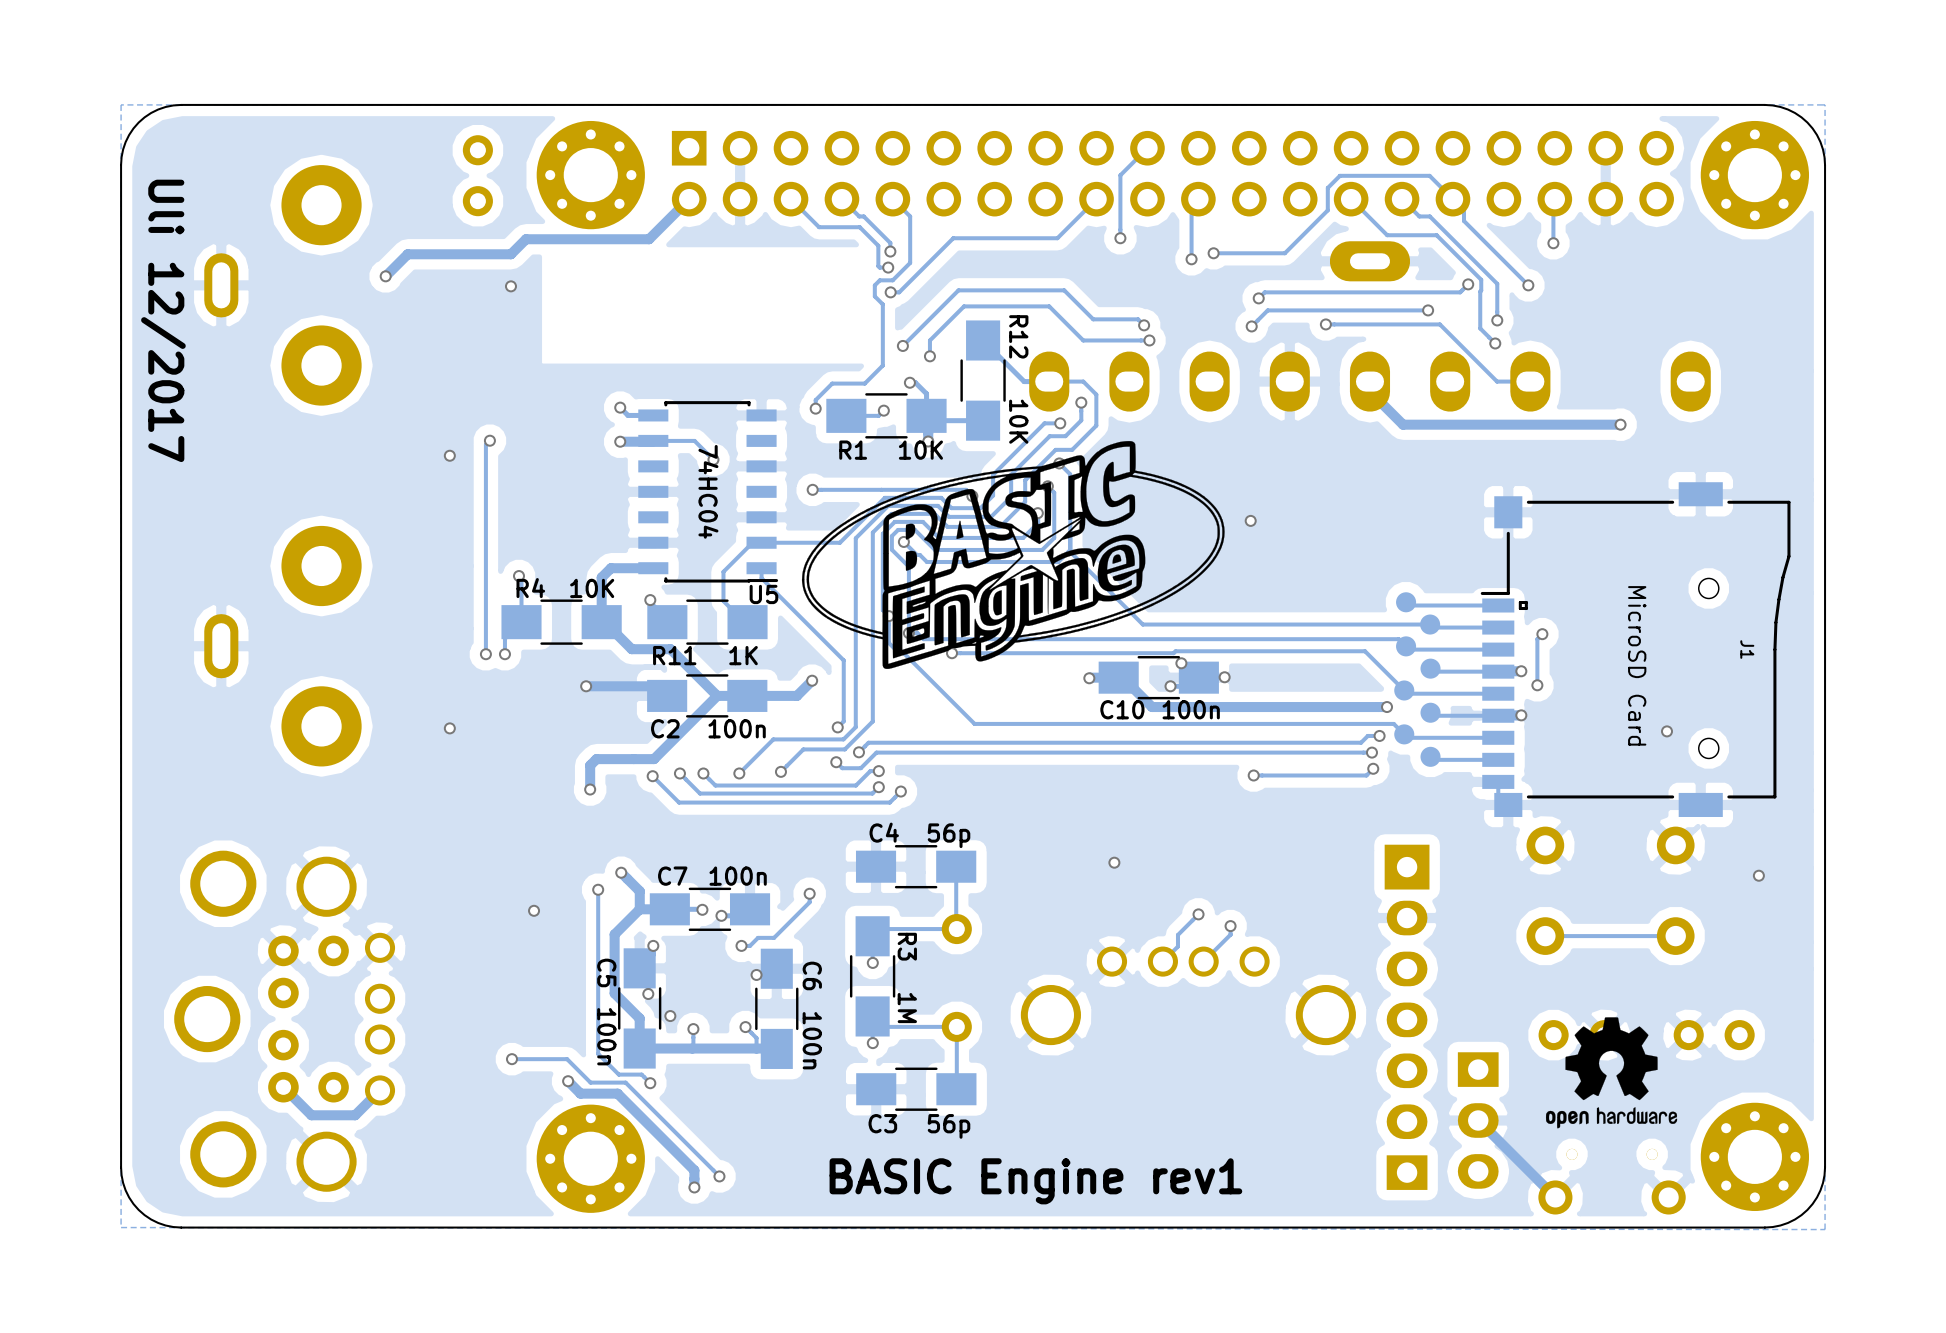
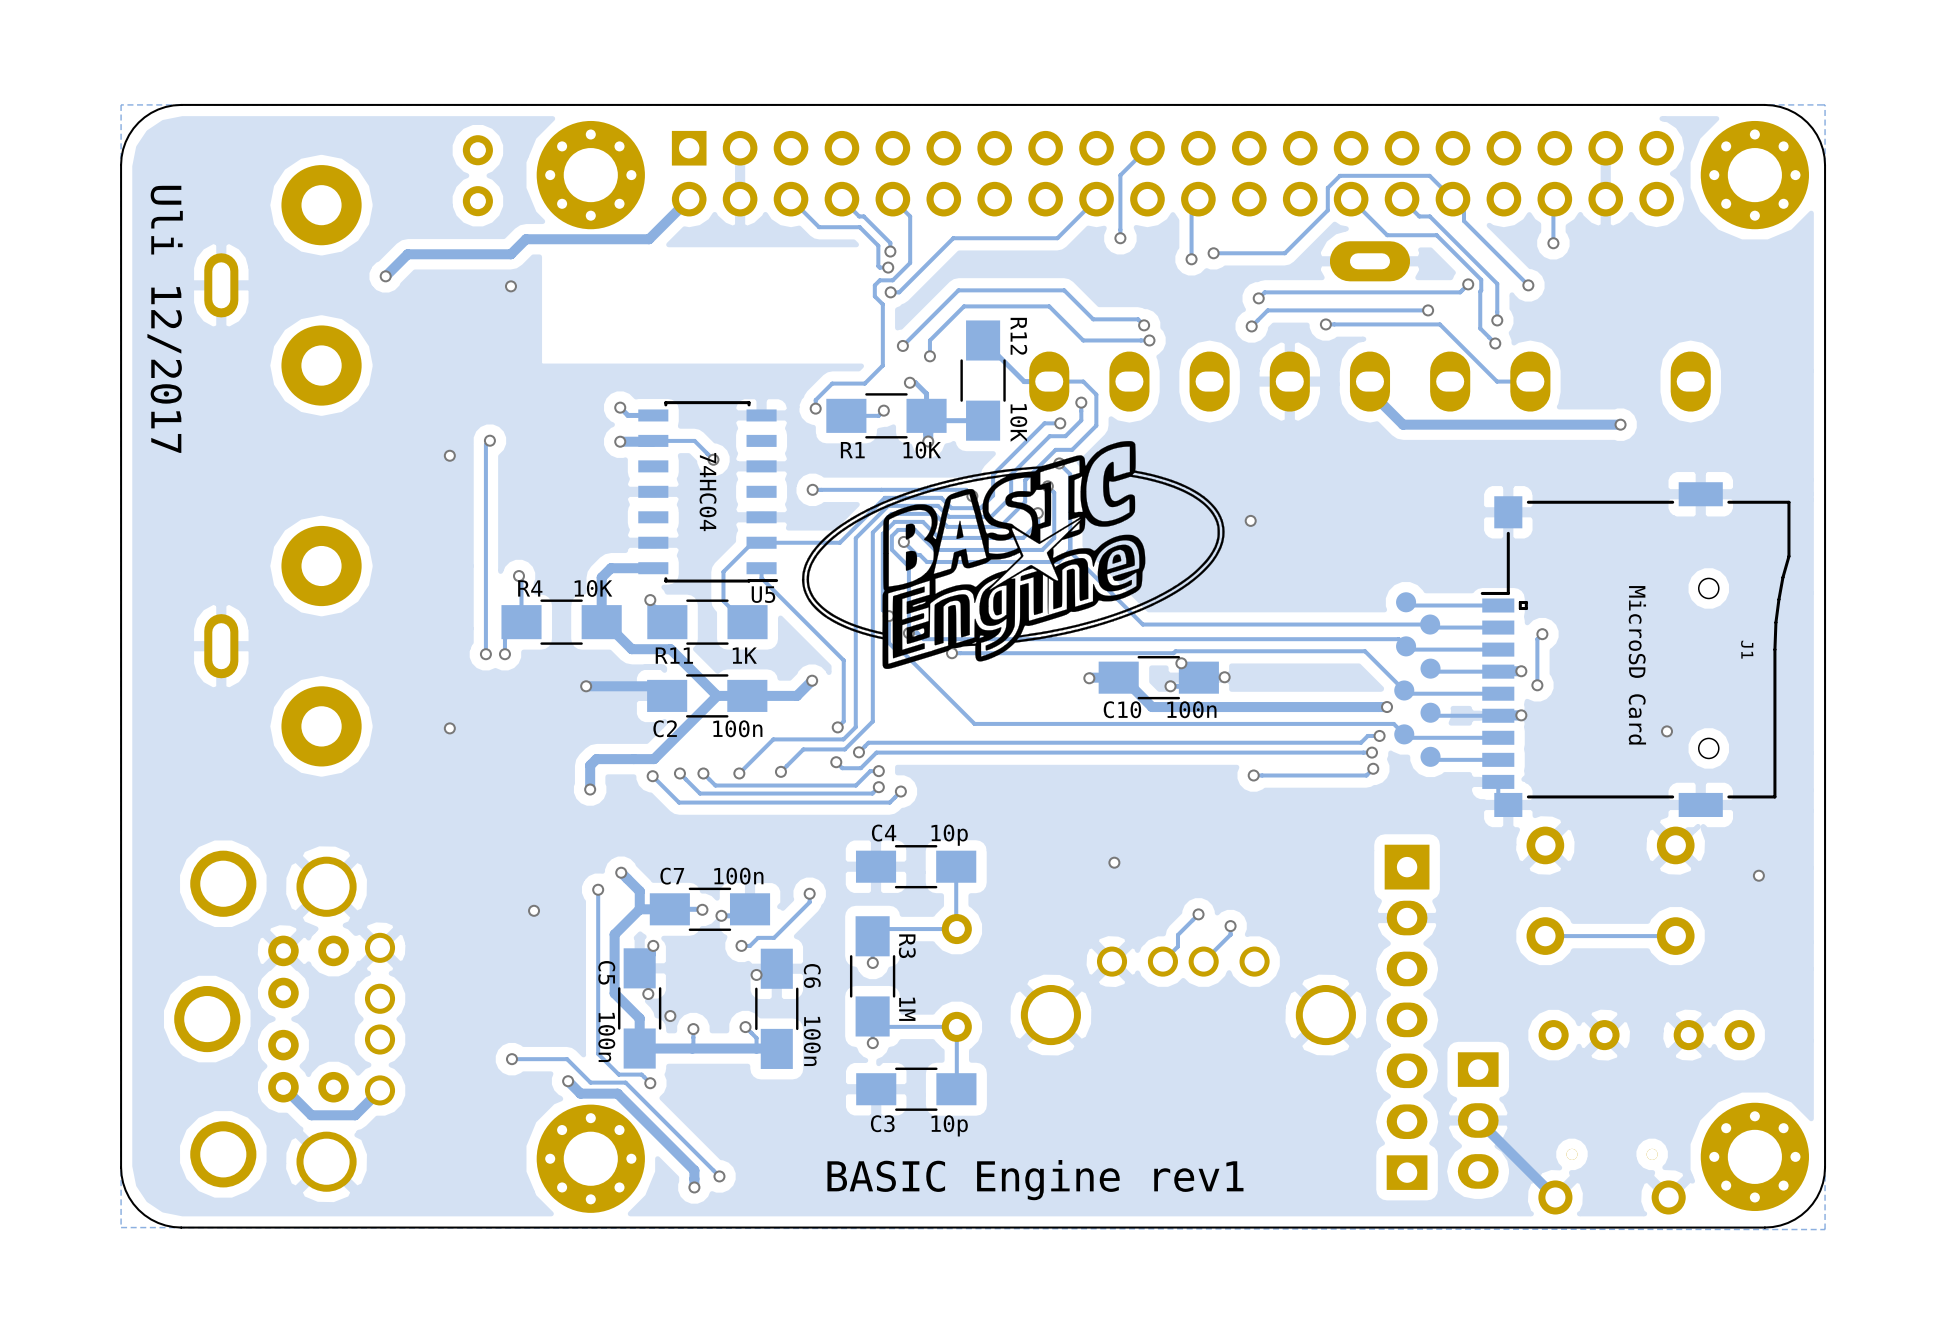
C4 value: 56p (949, 835) -> 10p (949, 835)
drawing: [1545, 1017, 1678, 1129] -> none
C3 value: 56p (949, 1126) -> 10p (949, 1125)

